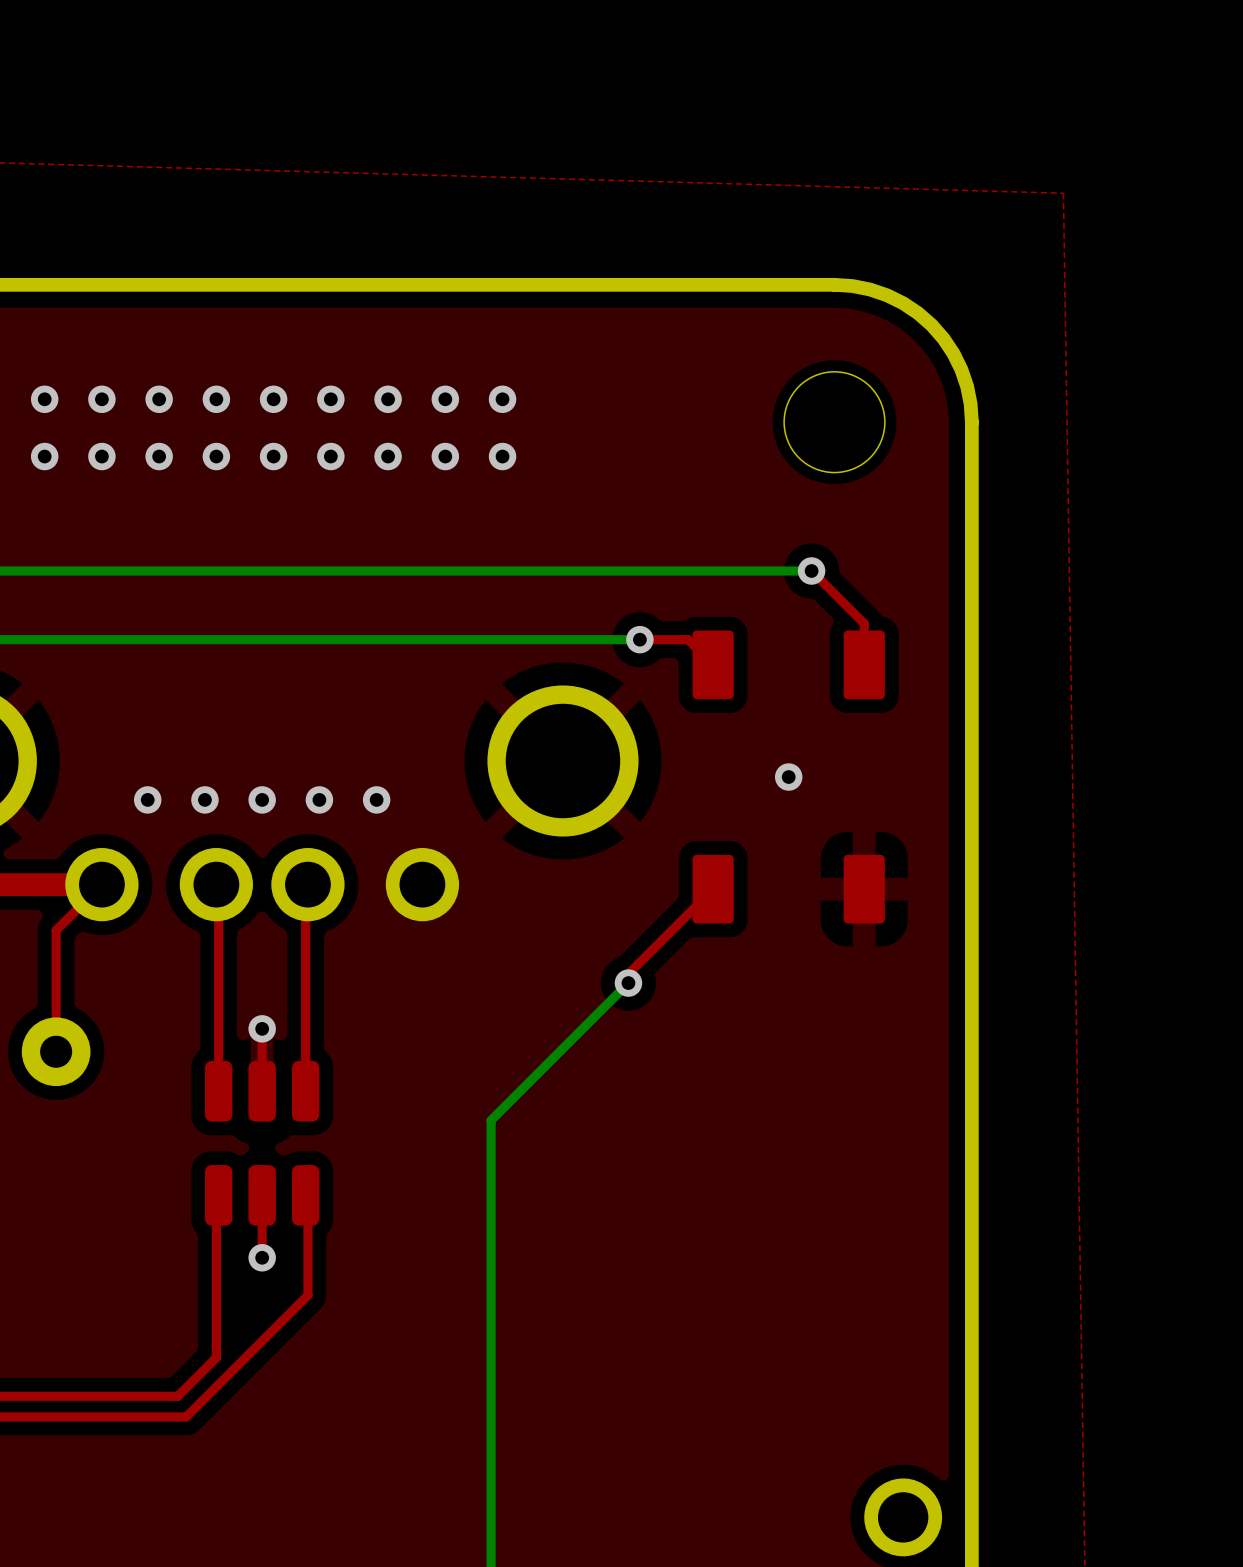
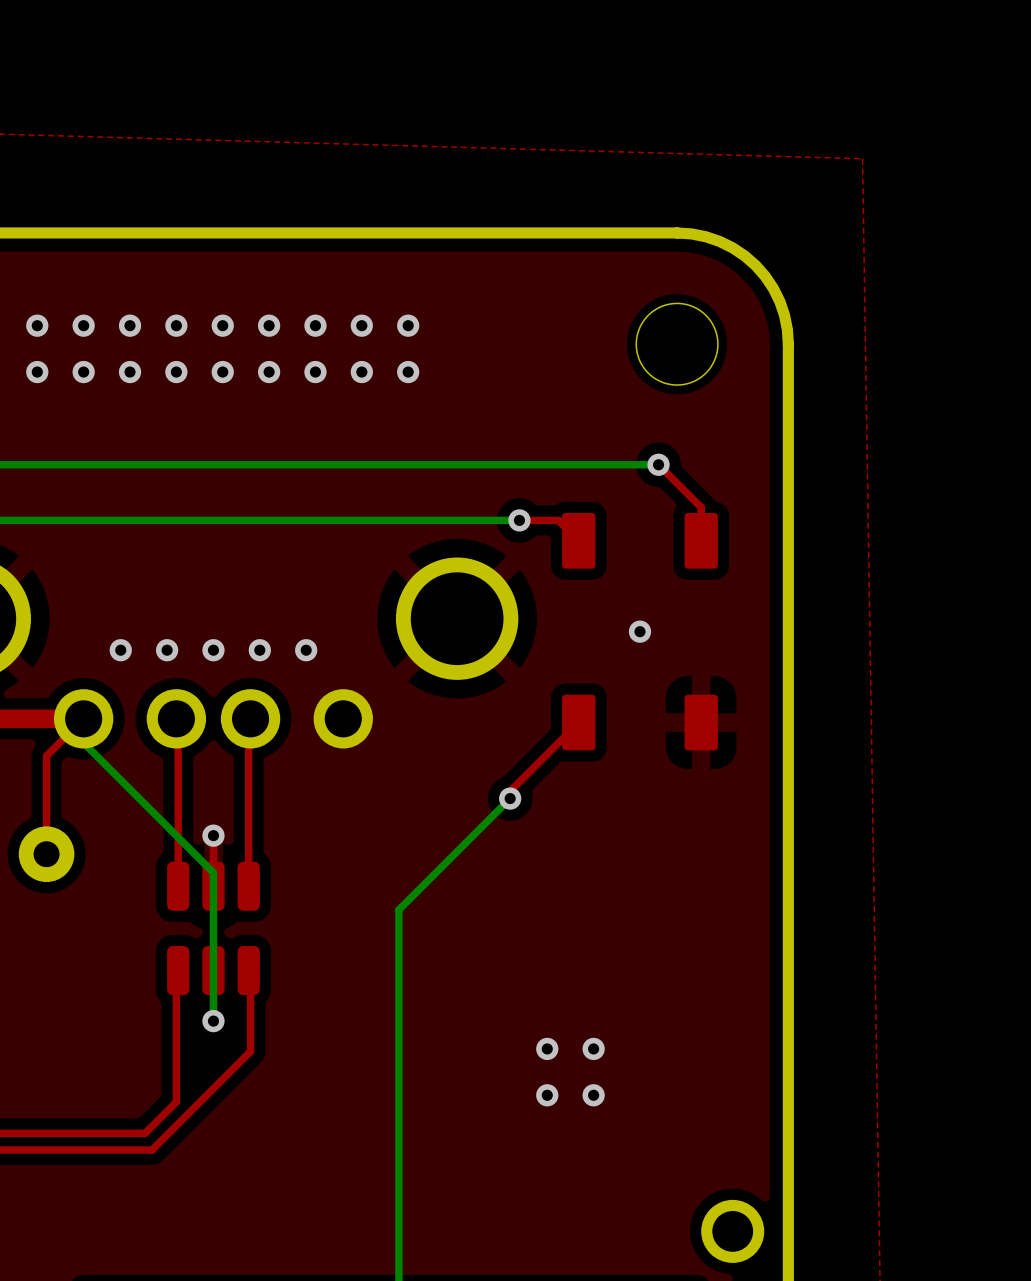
bottom track: none -> (83, 718) (83, 742) (213, 872) (213, 1021)
via: none -> (547, 1048)
via: none -> (593, 1048)
via: none -> (547, 1095)
via: none -> (593, 1095)

